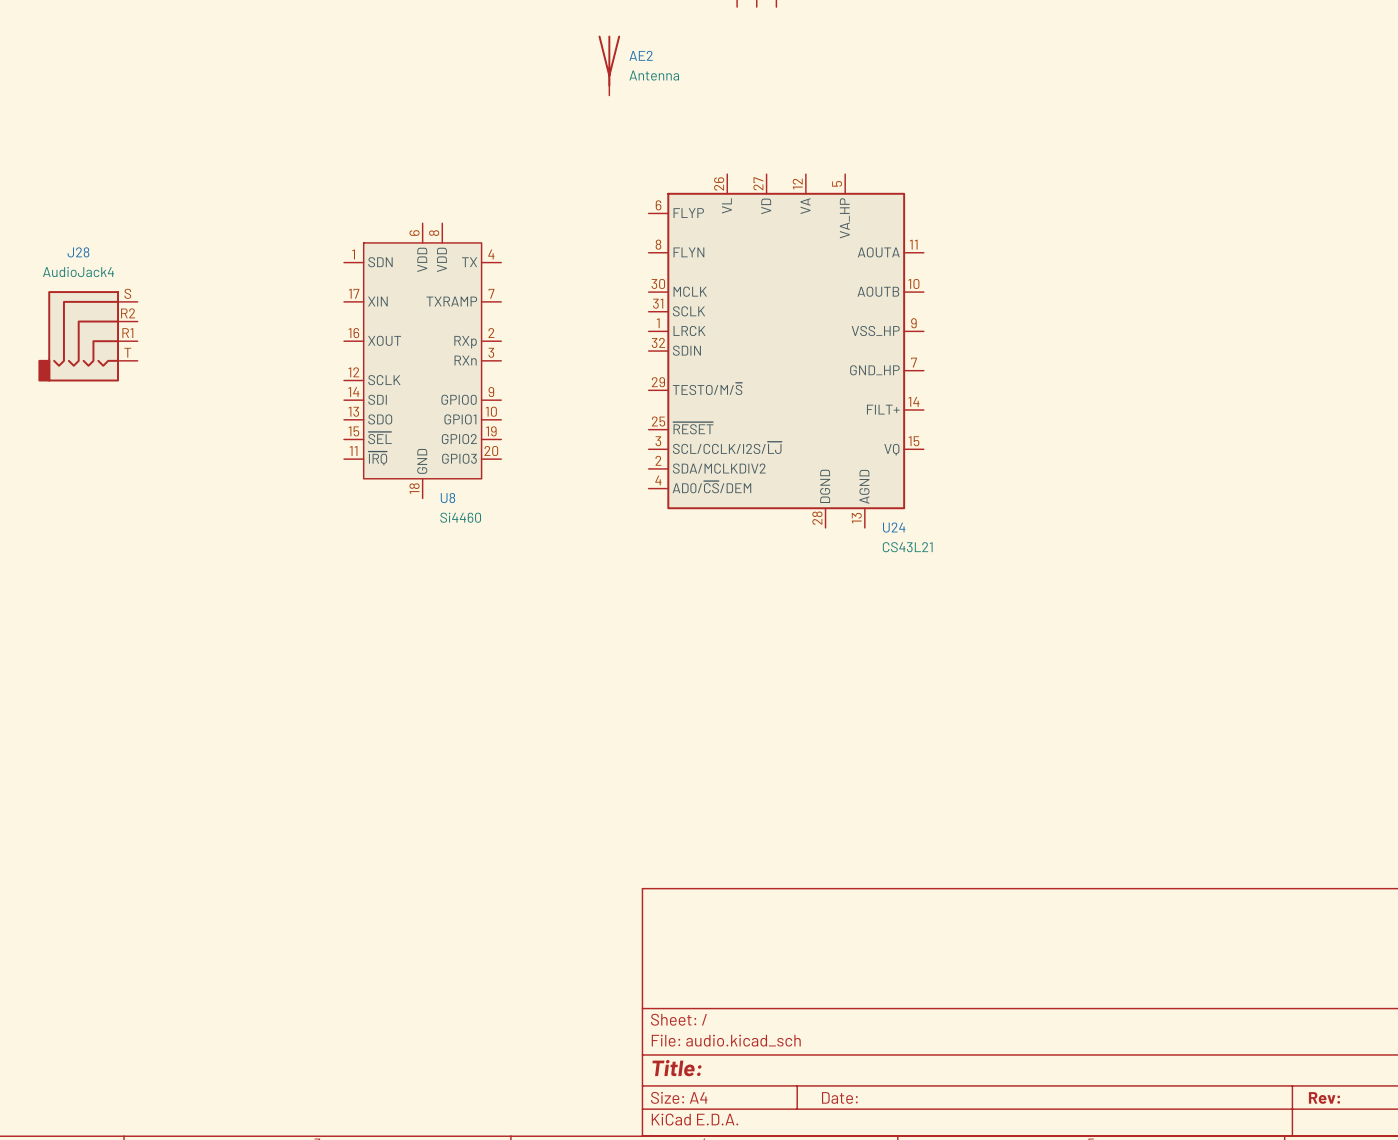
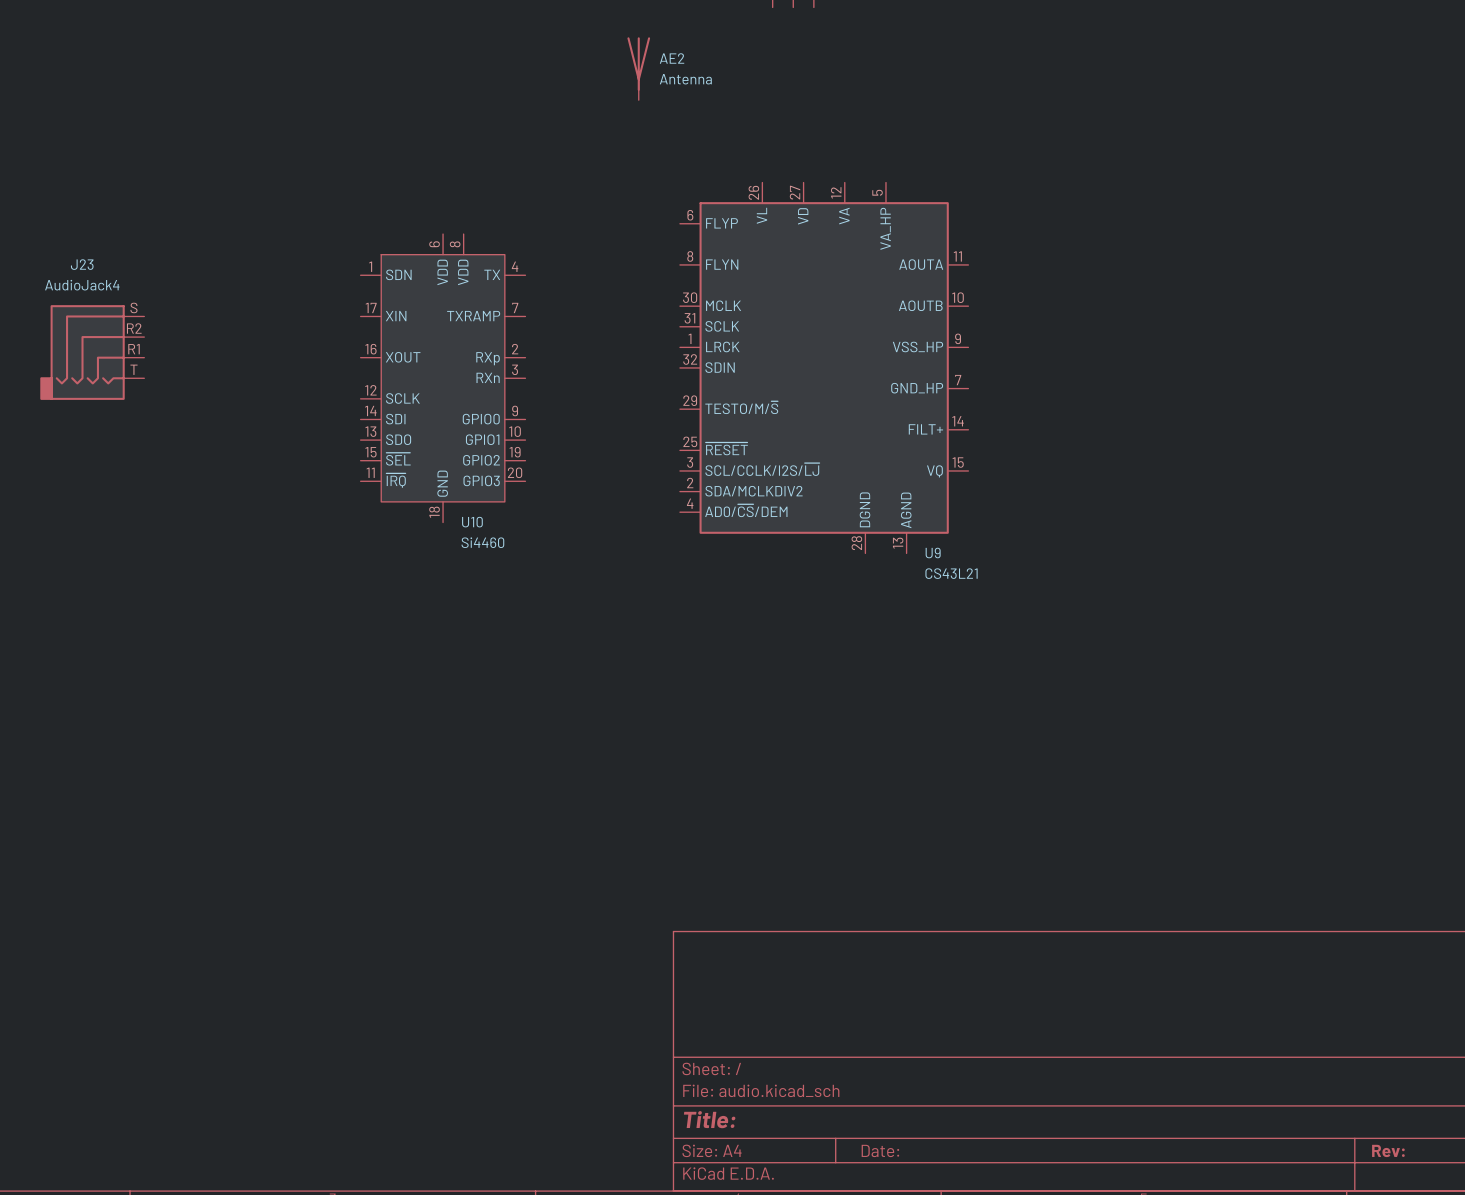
J28 name: J28 (78, 252) -> J23 (82, 264)
U8 name: U8 (447, 498) -> U10 (472, 522)
U24 name: U24 (894, 527) -> U9 (933, 553)

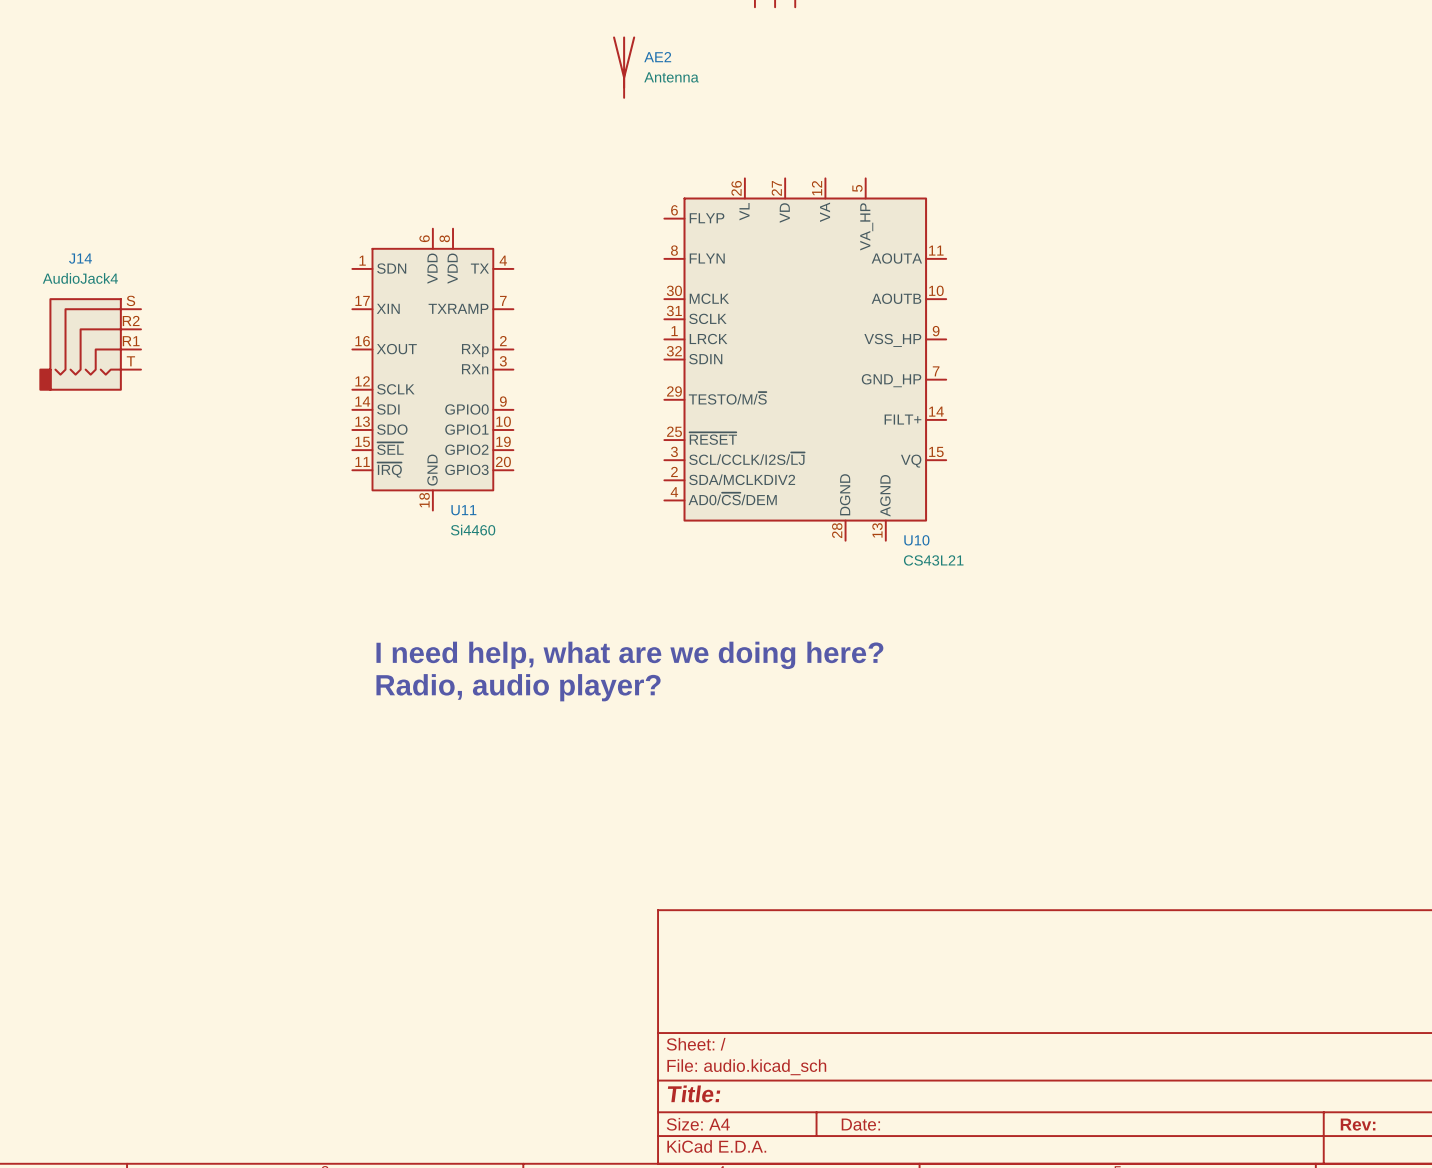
J23 name: J23 (82, 264) -> J14 (80, 258)
U10 name: U10 (472, 522) -> U11 (463, 510)
U9 name: U9 (933, 553) -> U10 (916, 540)
text: none -> I need help, what are we doing here? (629, 655)
text: none -> Radio, audio player? (518, 687)

